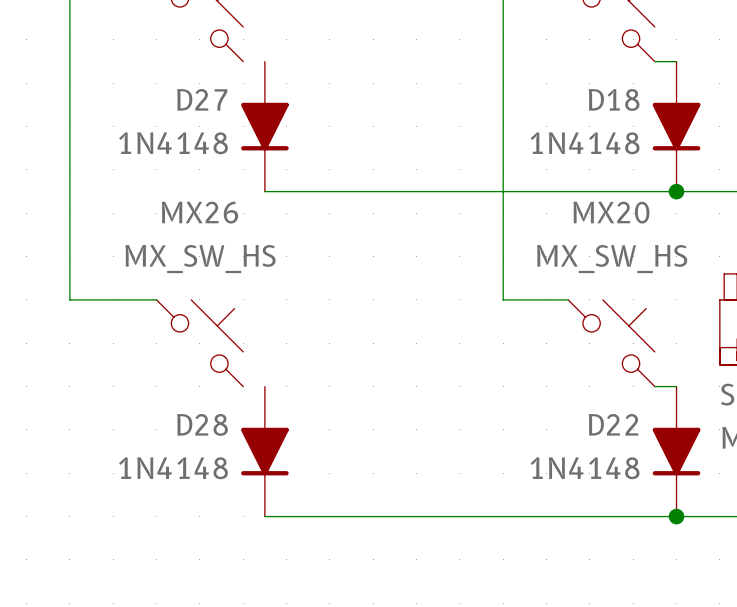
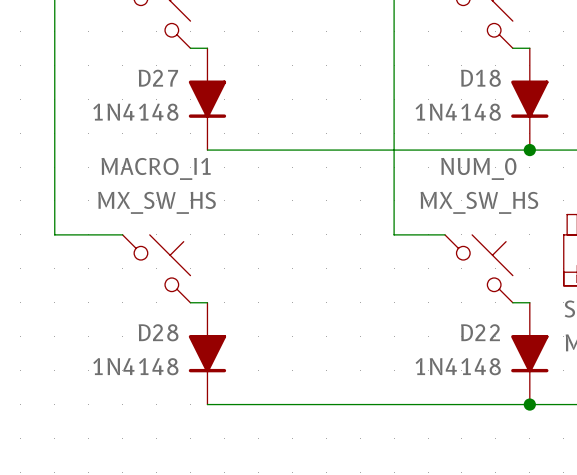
wire: none -> (190, 48) (207, 48)
MX26 name: MX26 (199, 212) -> MACRO_I1 (156, 168)
MX20 name: MX20 (611, 212) -> NUM_0 (478, 168)
wire: none -> (190, 302) (207, 302)

